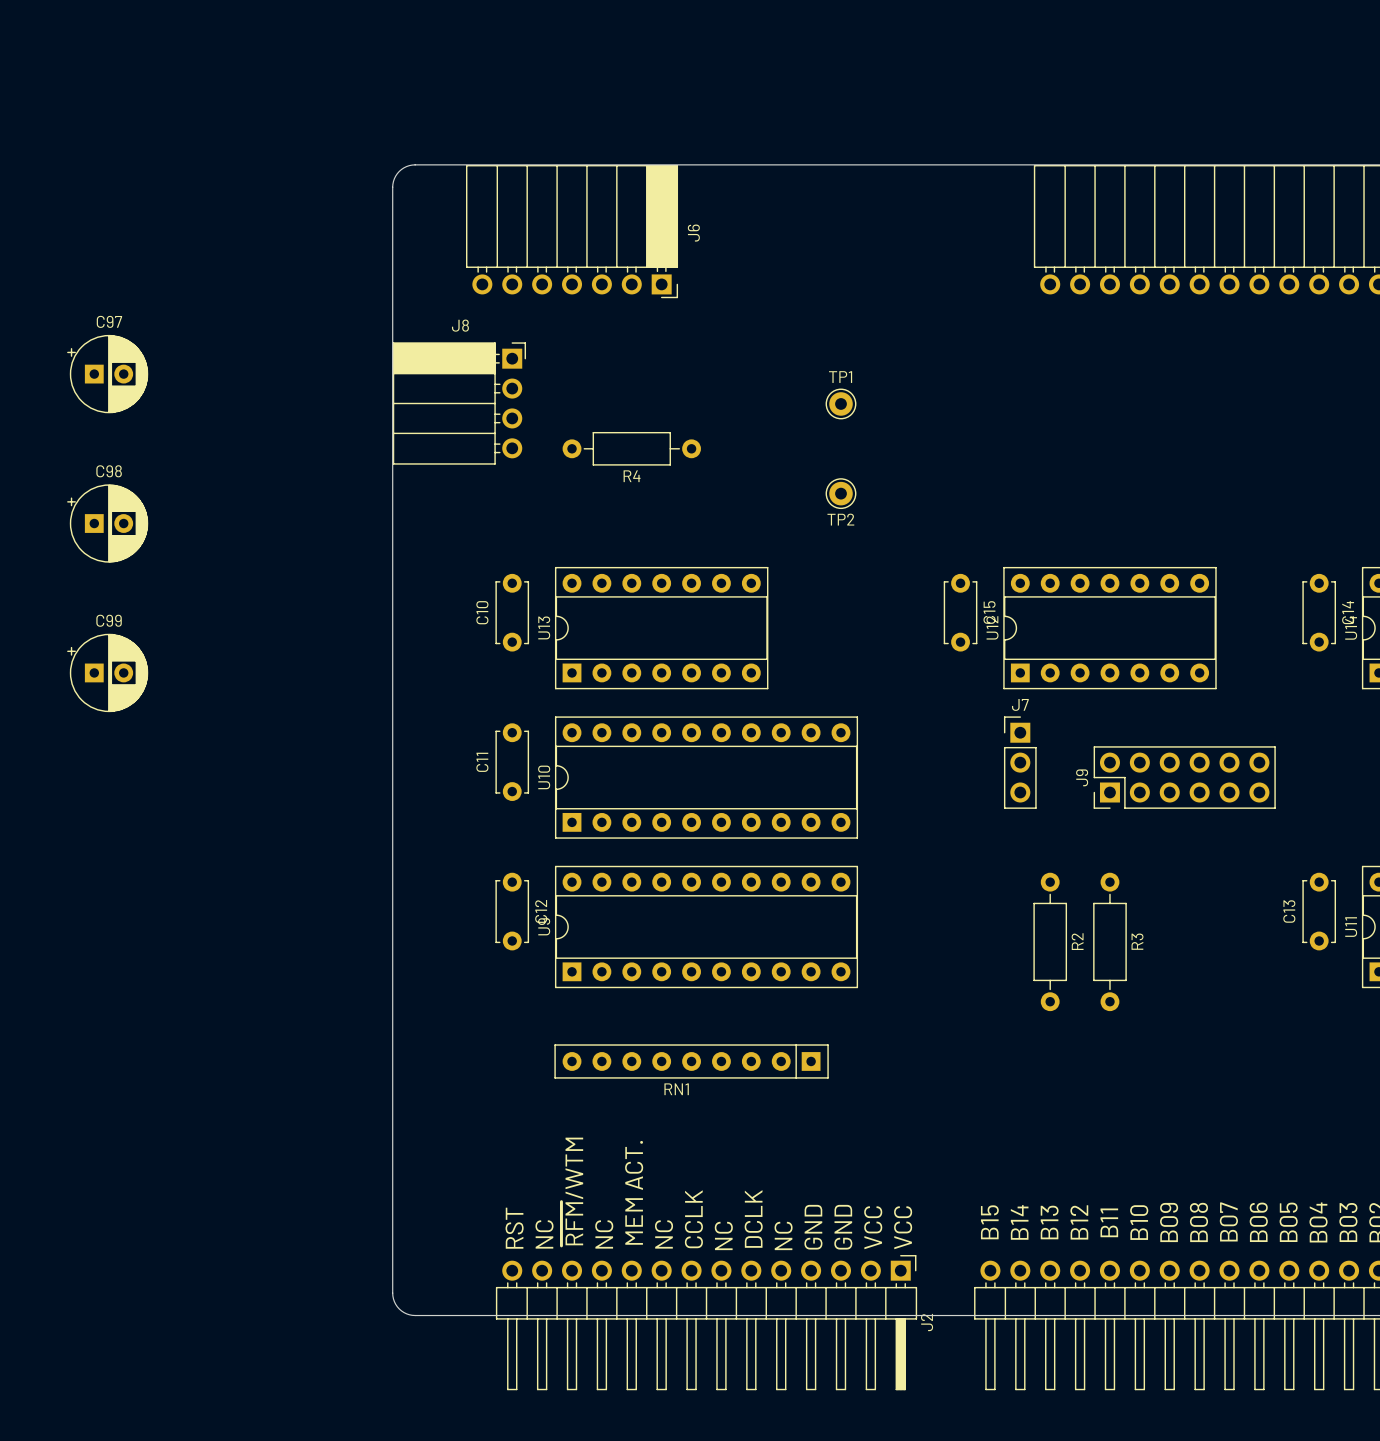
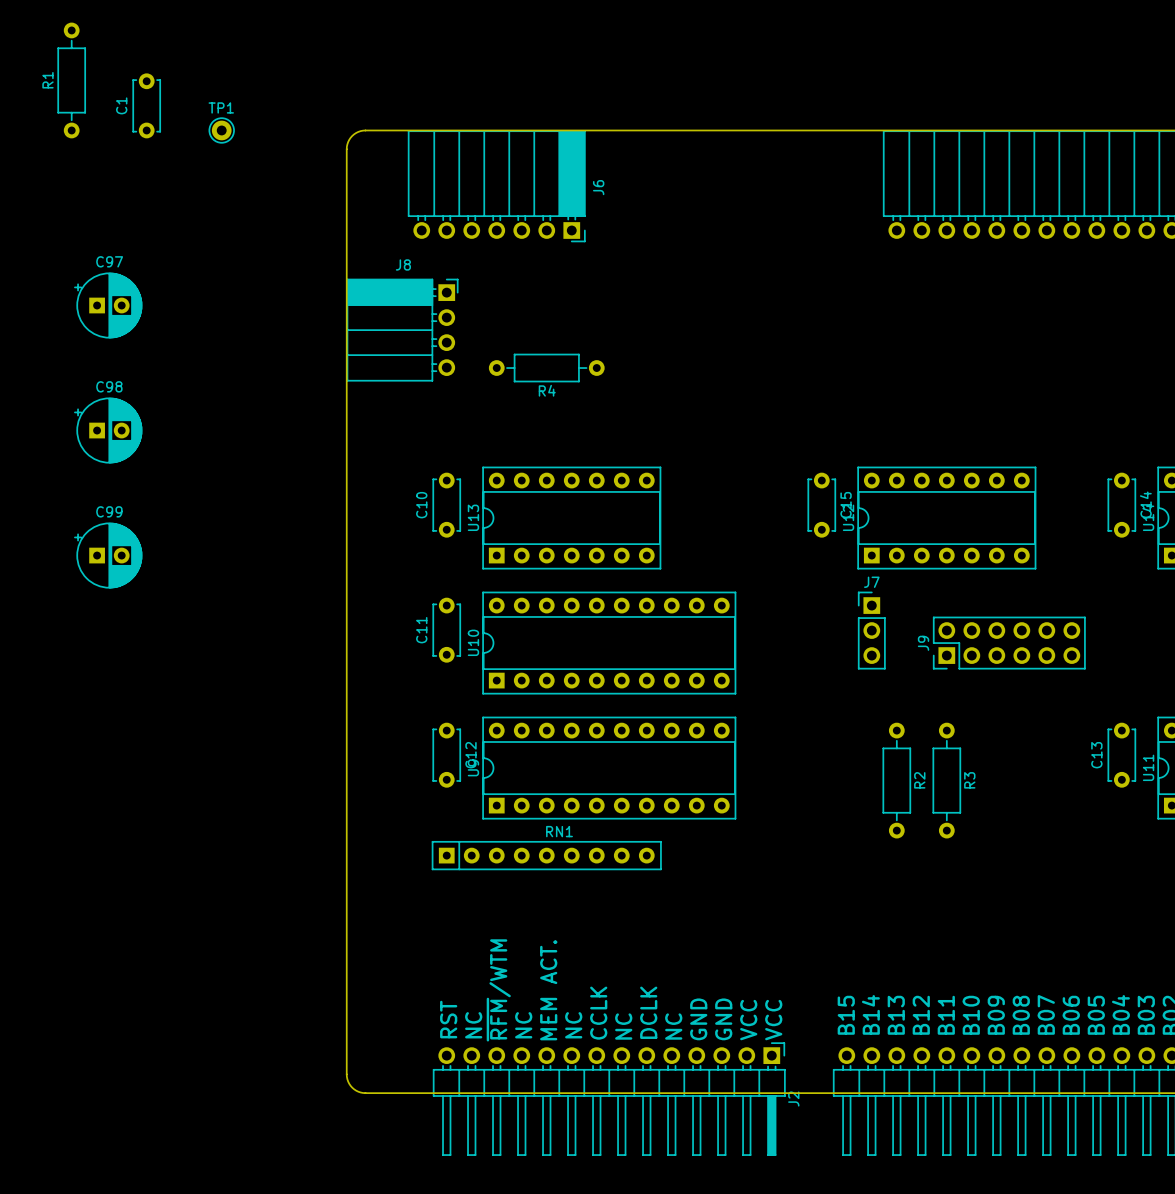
R1: none -> (71, 80)
C1: none -> (146, 105)
TP1 position: (841, 403) -> (221, 130)
TP2: (841, 493) -> none
RN1 rotation: 0° (691, 1061) -> 180° (546, 855)

